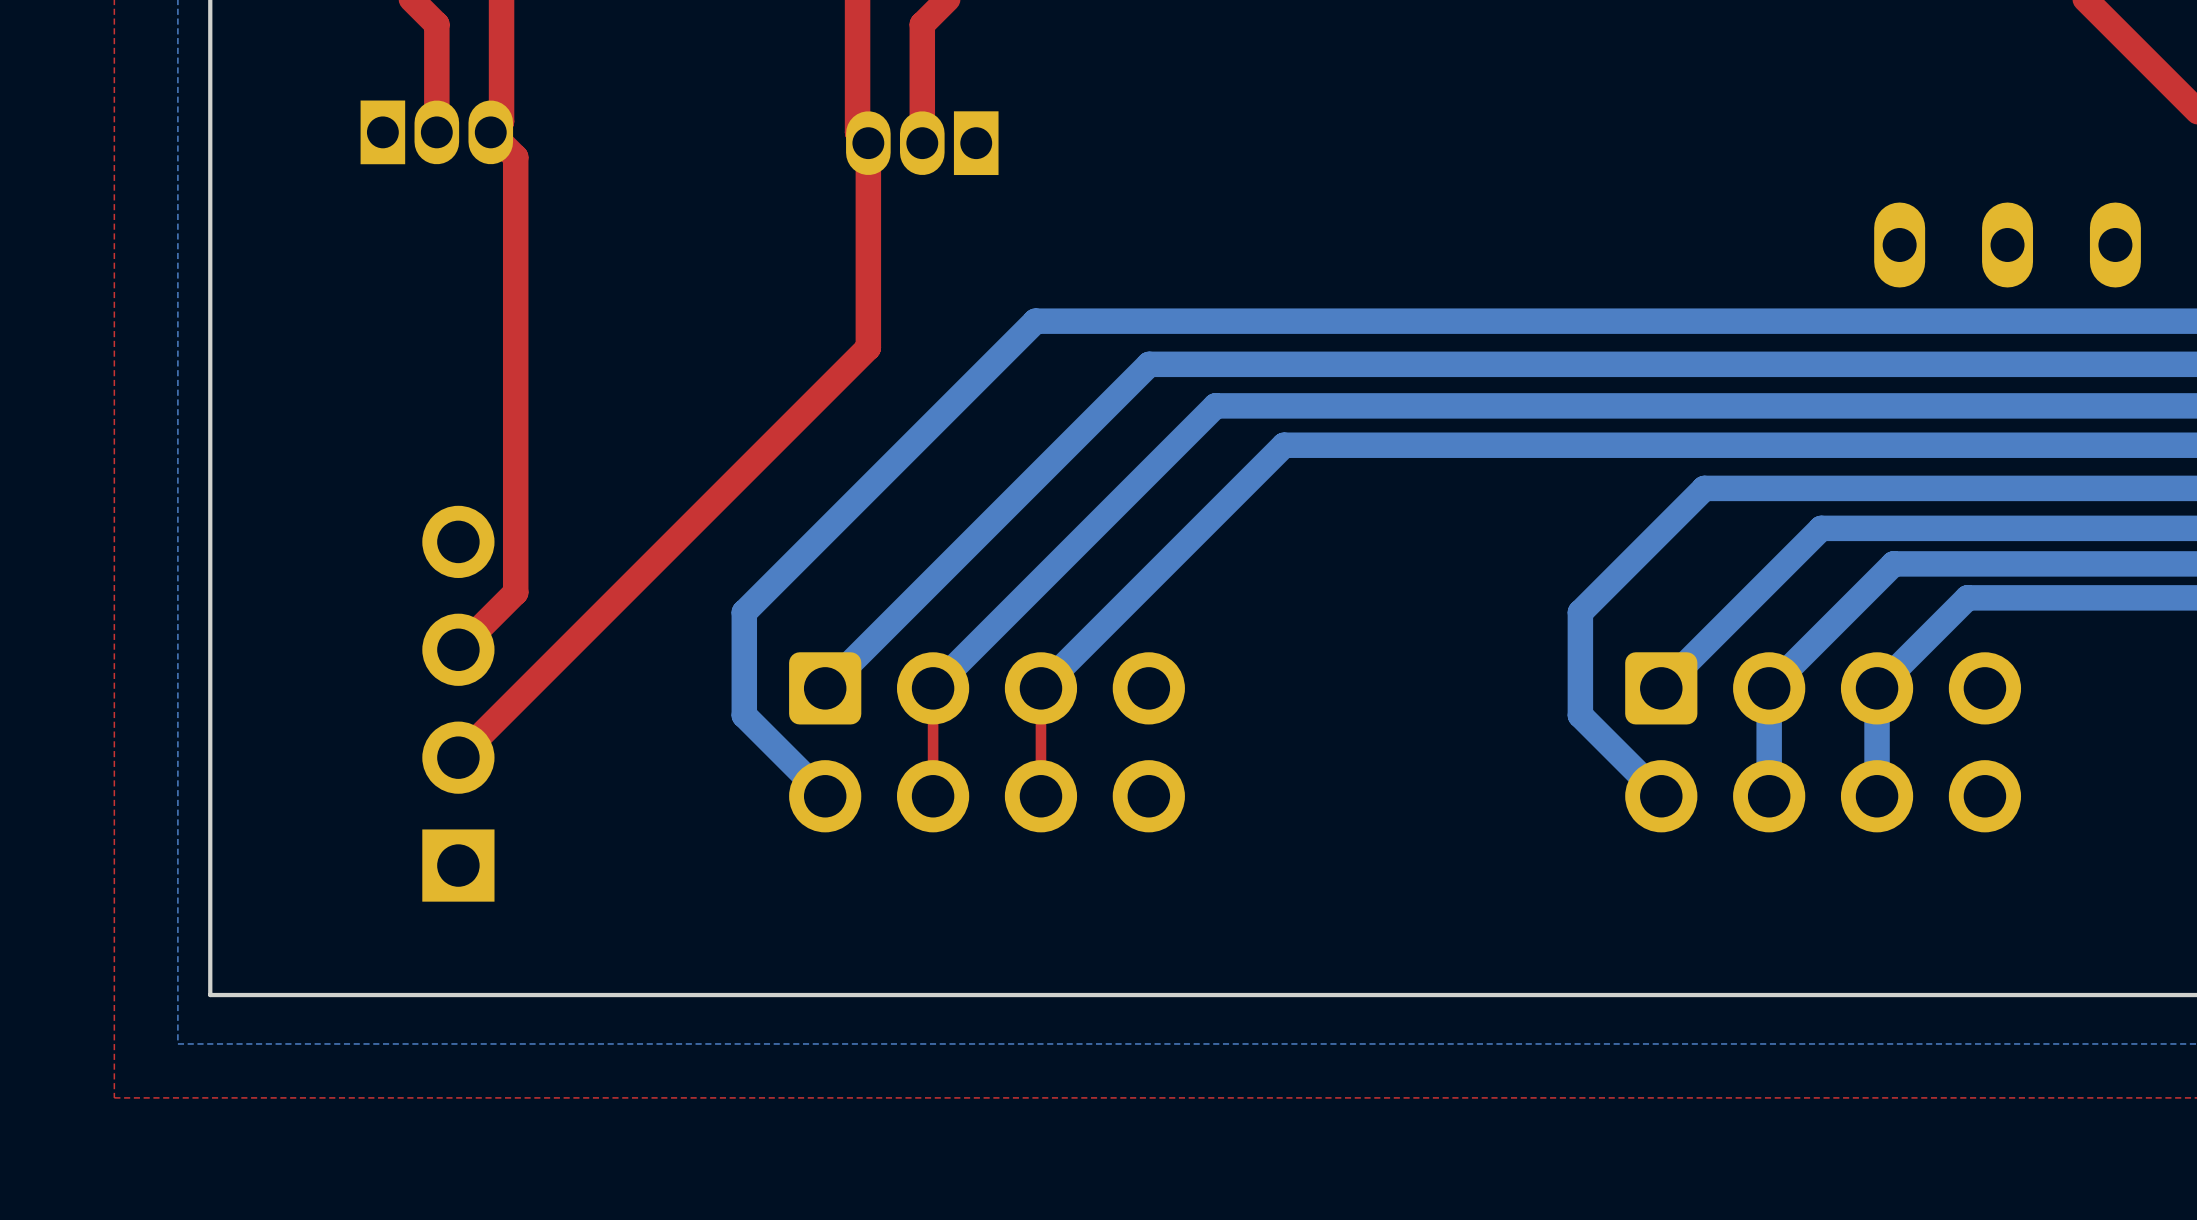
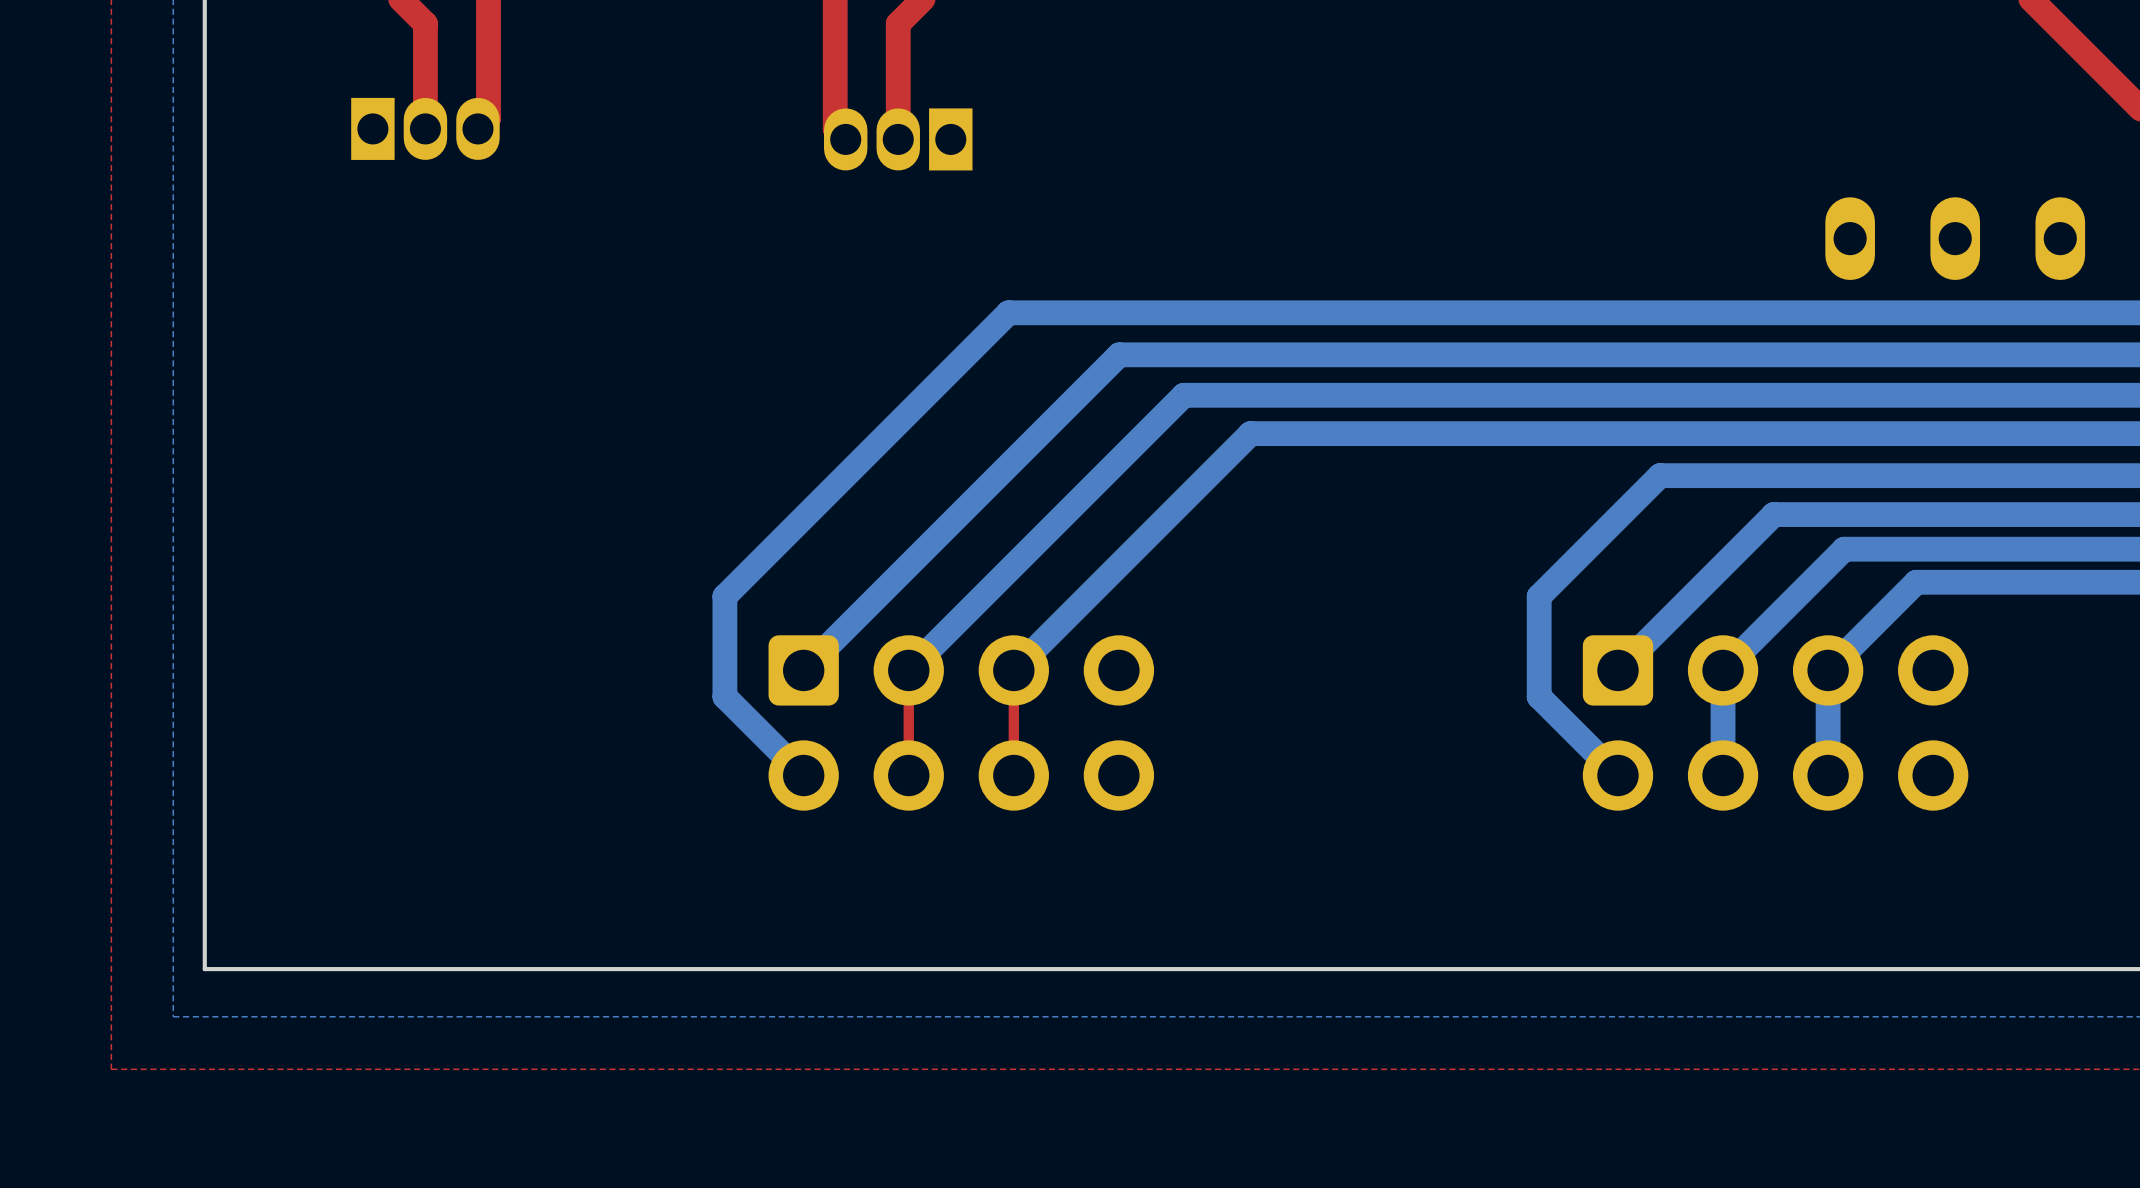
top track: (490, 132) (515, 157) (515, 592) (458, 649) -> none
top track: (868, 143) (868, 347) (458, 757) -> none
part: (458, 703) -> none

